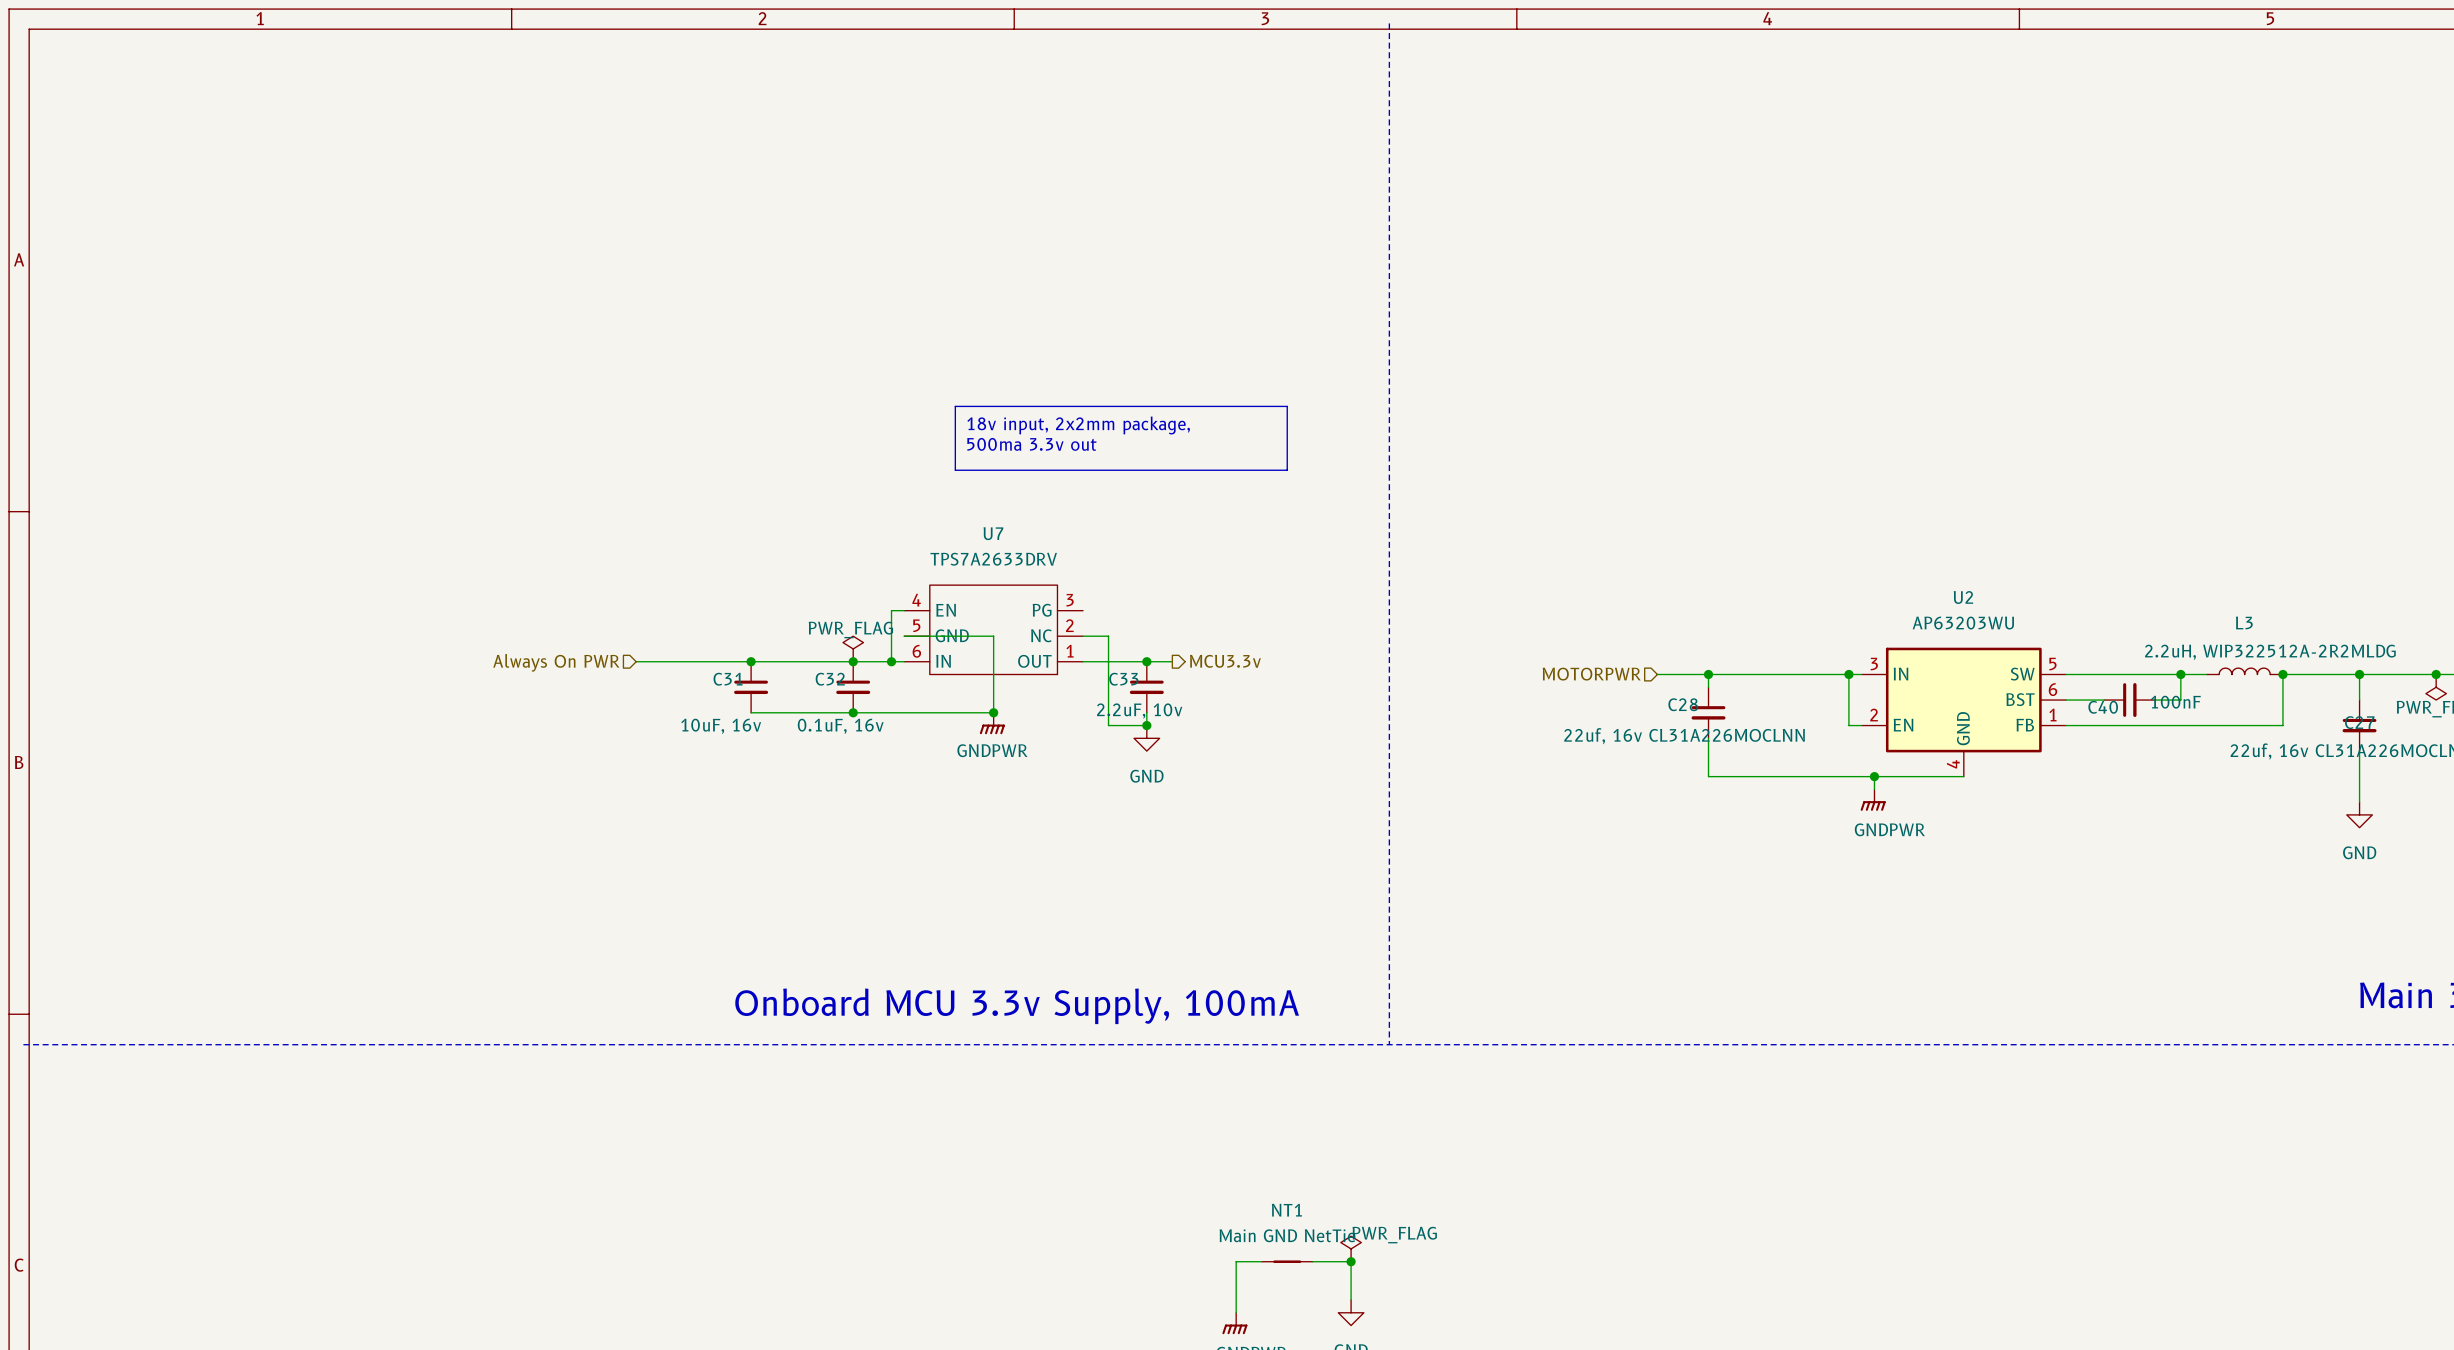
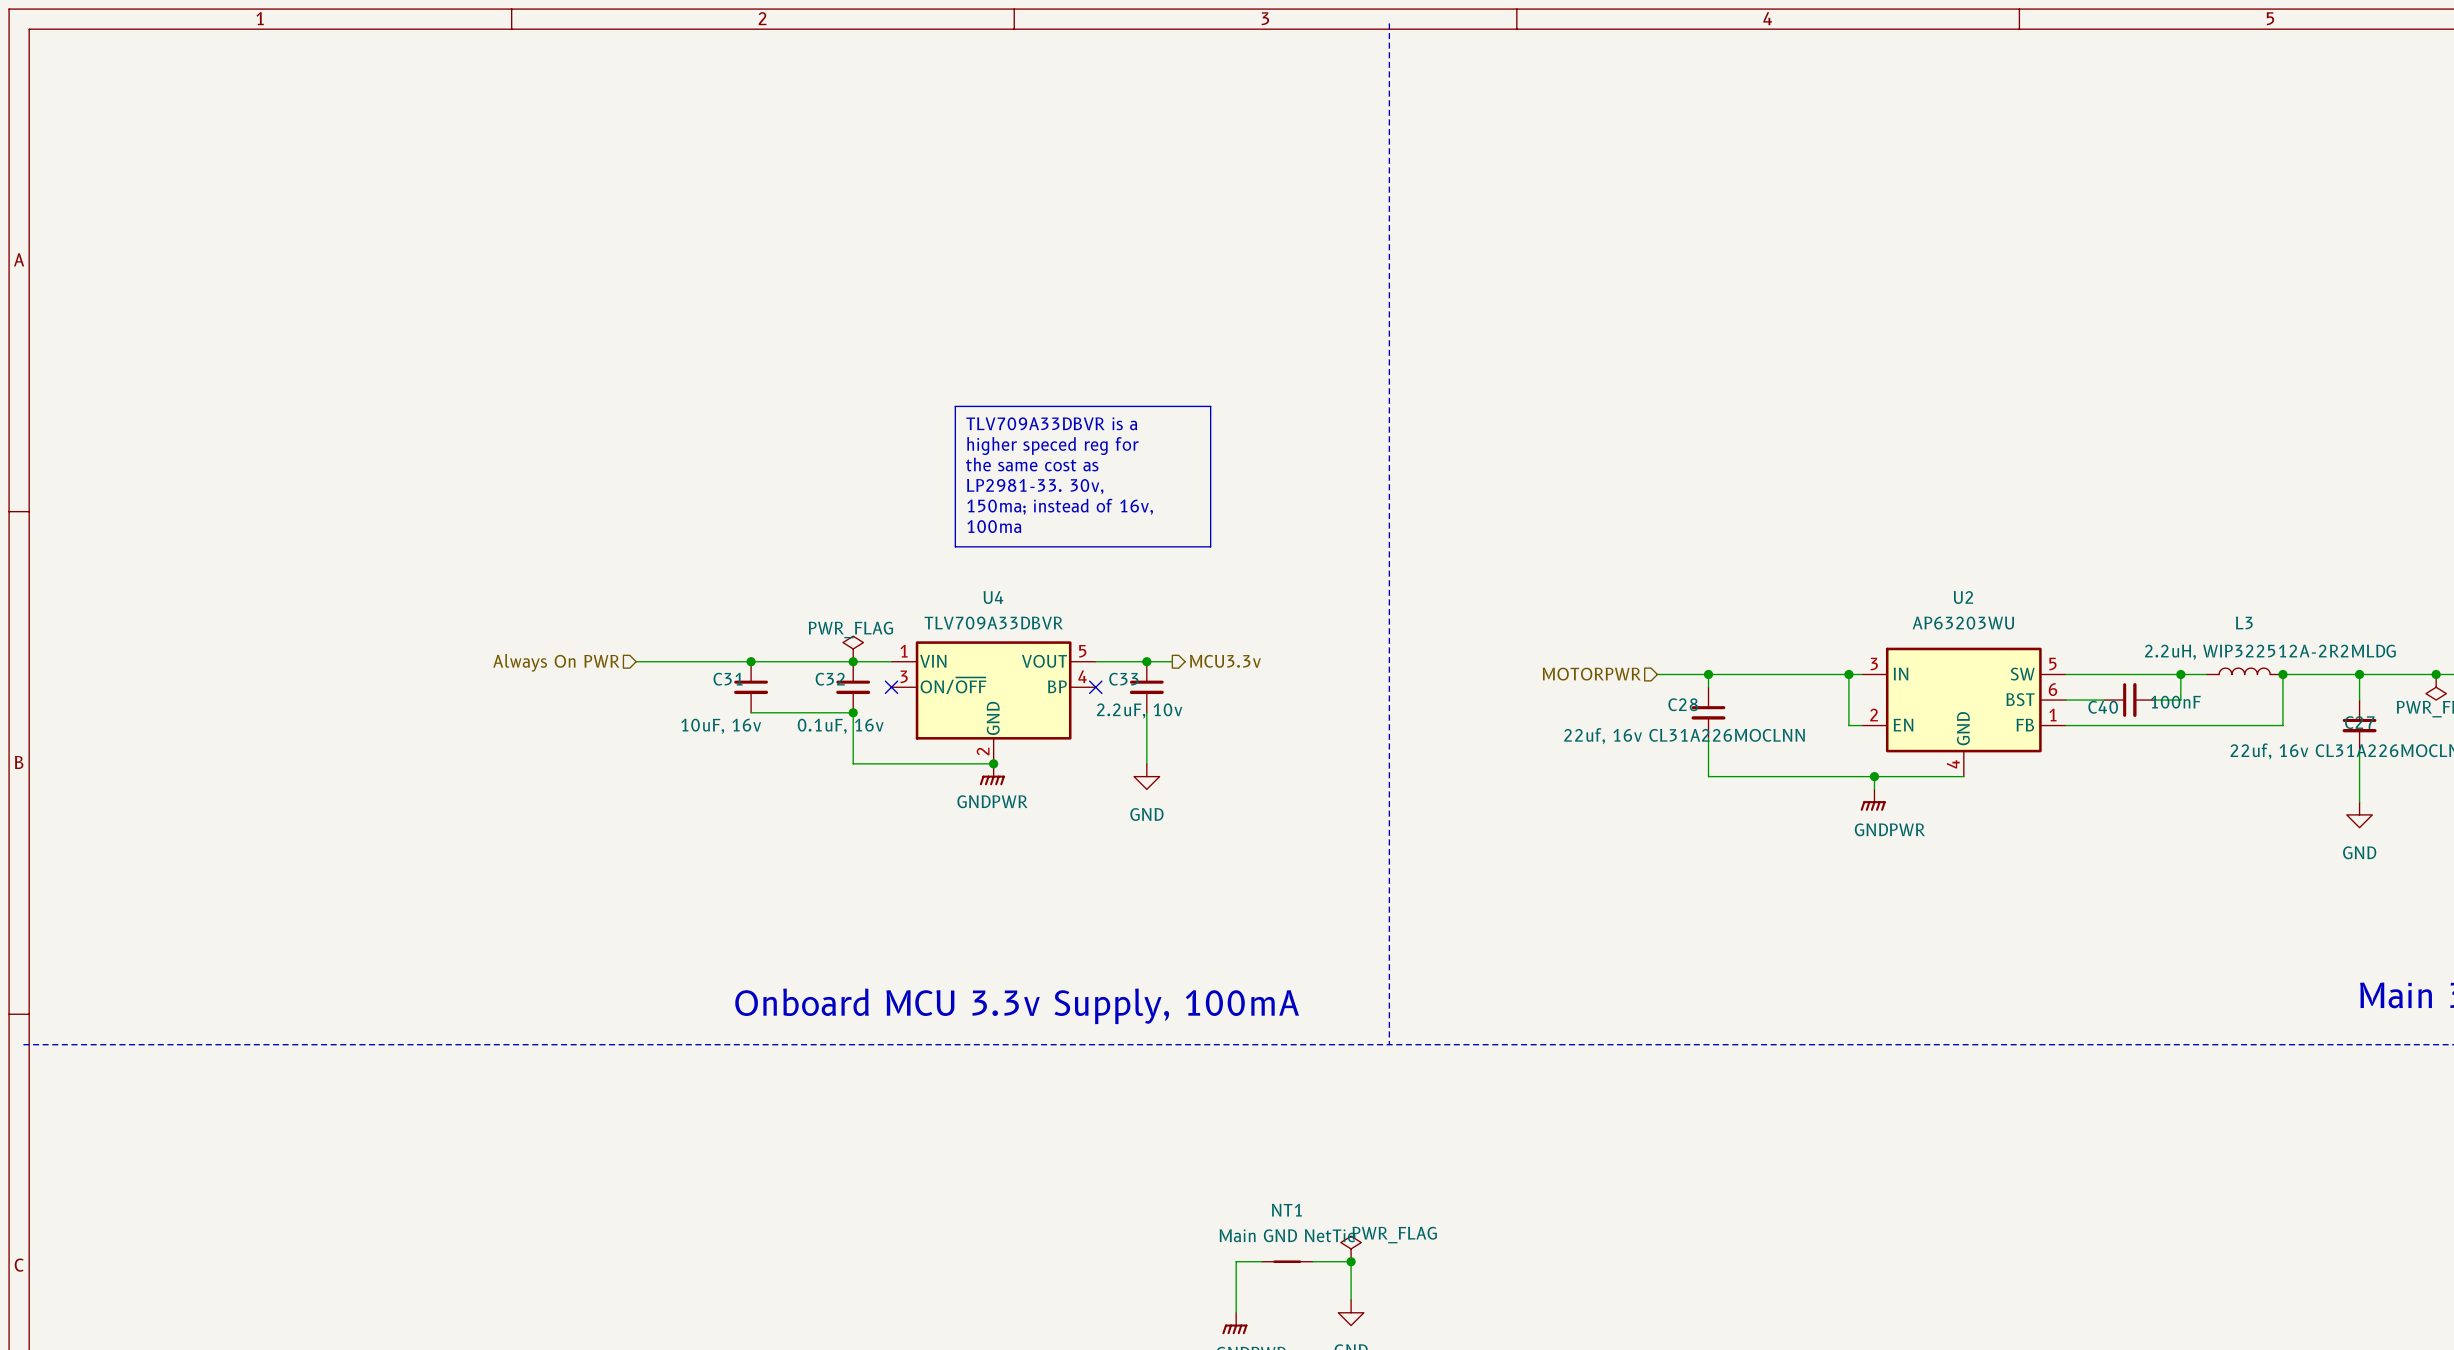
line: (1210, 406) (1287, 406) (1287, 470) (955, 470) -> (1210, 406) (1210, 546) (955, 546) (955, 470)
text: 18v input, 2x2mm package, (1078, 425) -> TLV709A33DBVR is a (1051, 423)
text: 500ma 3.3v out (1031, 444) -> higher speced reg for (1052, 446)
text: none -> the same cost as (1032, 464)
text: none -> LP2981-33. 30v, (1035, 486)
text: none -> 150ma; instead of 16v, (1060, 506)
text: none -> 100ma (994, 526)
wire: (904, 610) (891, 610) (891, 661) (904, 661) -> none
U7: TPS7A2633DRV (993, 629) -> none
wire: (904, 636) (993, 636) (993, 712) (853, 712) -> (993, 763) (853, 763) (853, 712)
wire: (1082, 636) (1108, 636) (1108, 725) (1146, 725) -> (1146, 763) (1146, 725)
junction: (891, 661) -> none
no-connect mark: none -> (891, 687)
no-connect mark: none -> (1095, 687)
U4: none -> TLV709A33DBVR (993, 702)
junction position: (993, 712) -> (993, 763)
power symbol position: GNDPWR (992, 723) -> GNDPWR (992, 774)
junction: (1146, 725) -> none
power symbol position: GND (1146, 738) -> GND (1146, 776)

